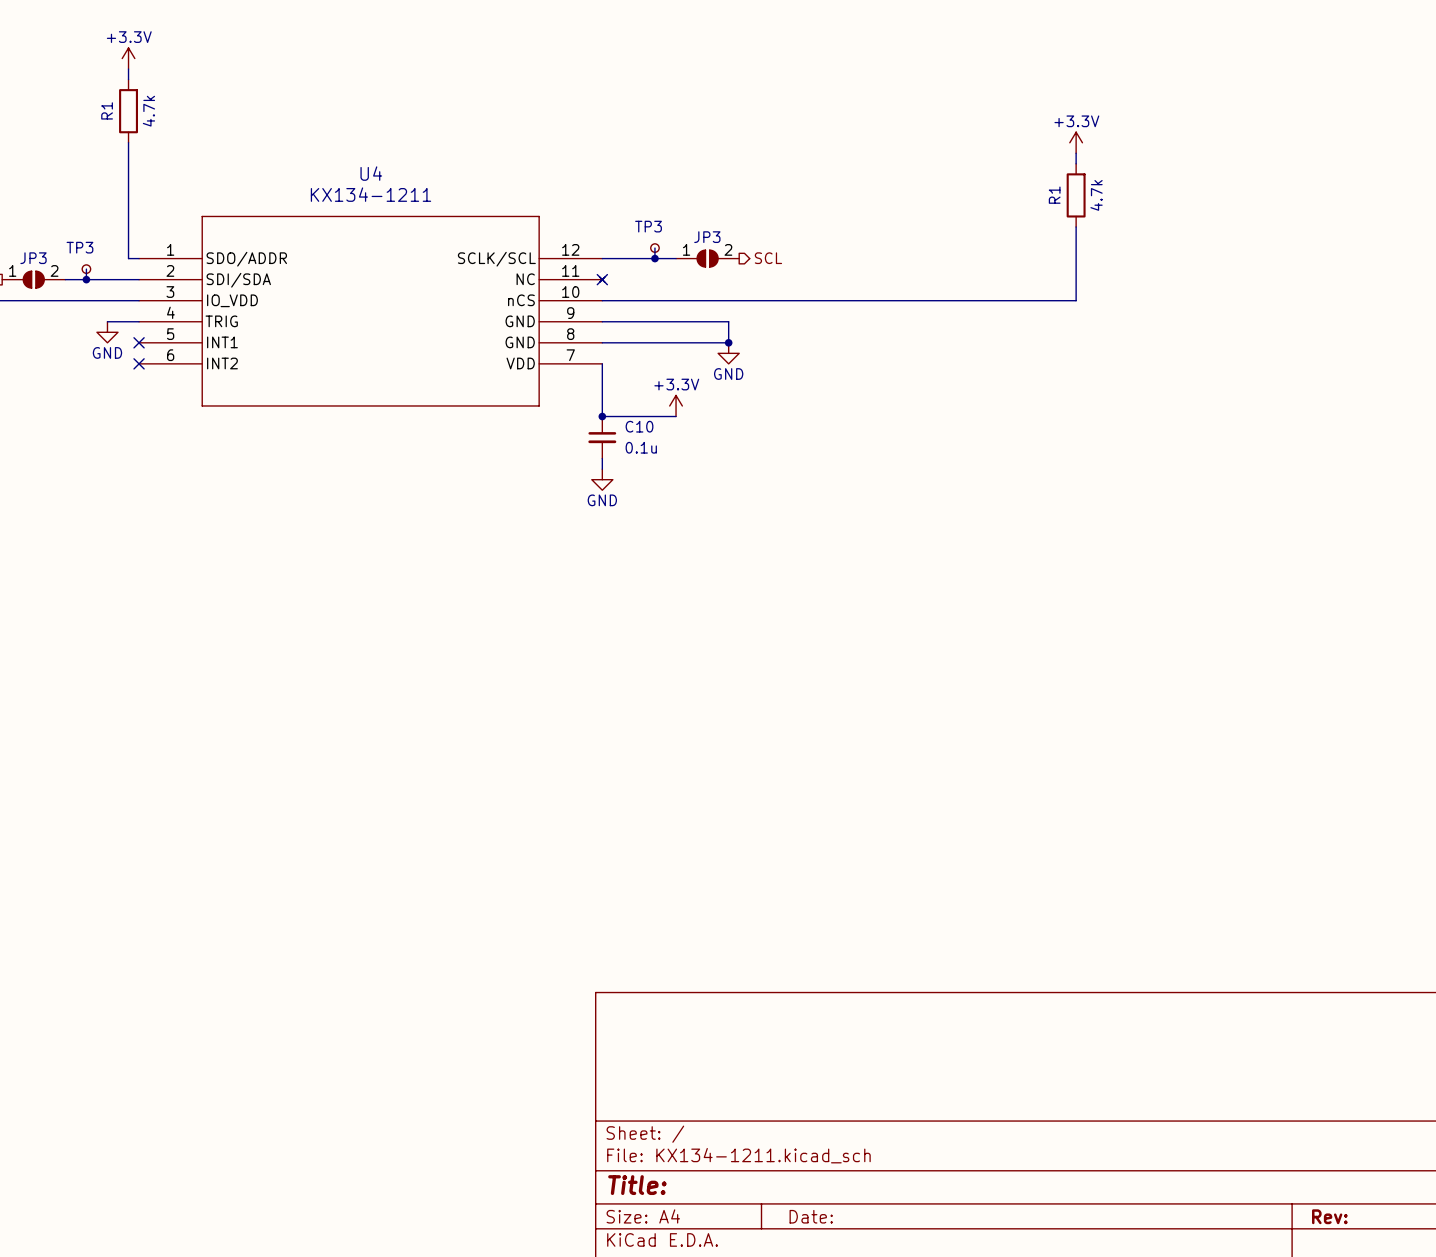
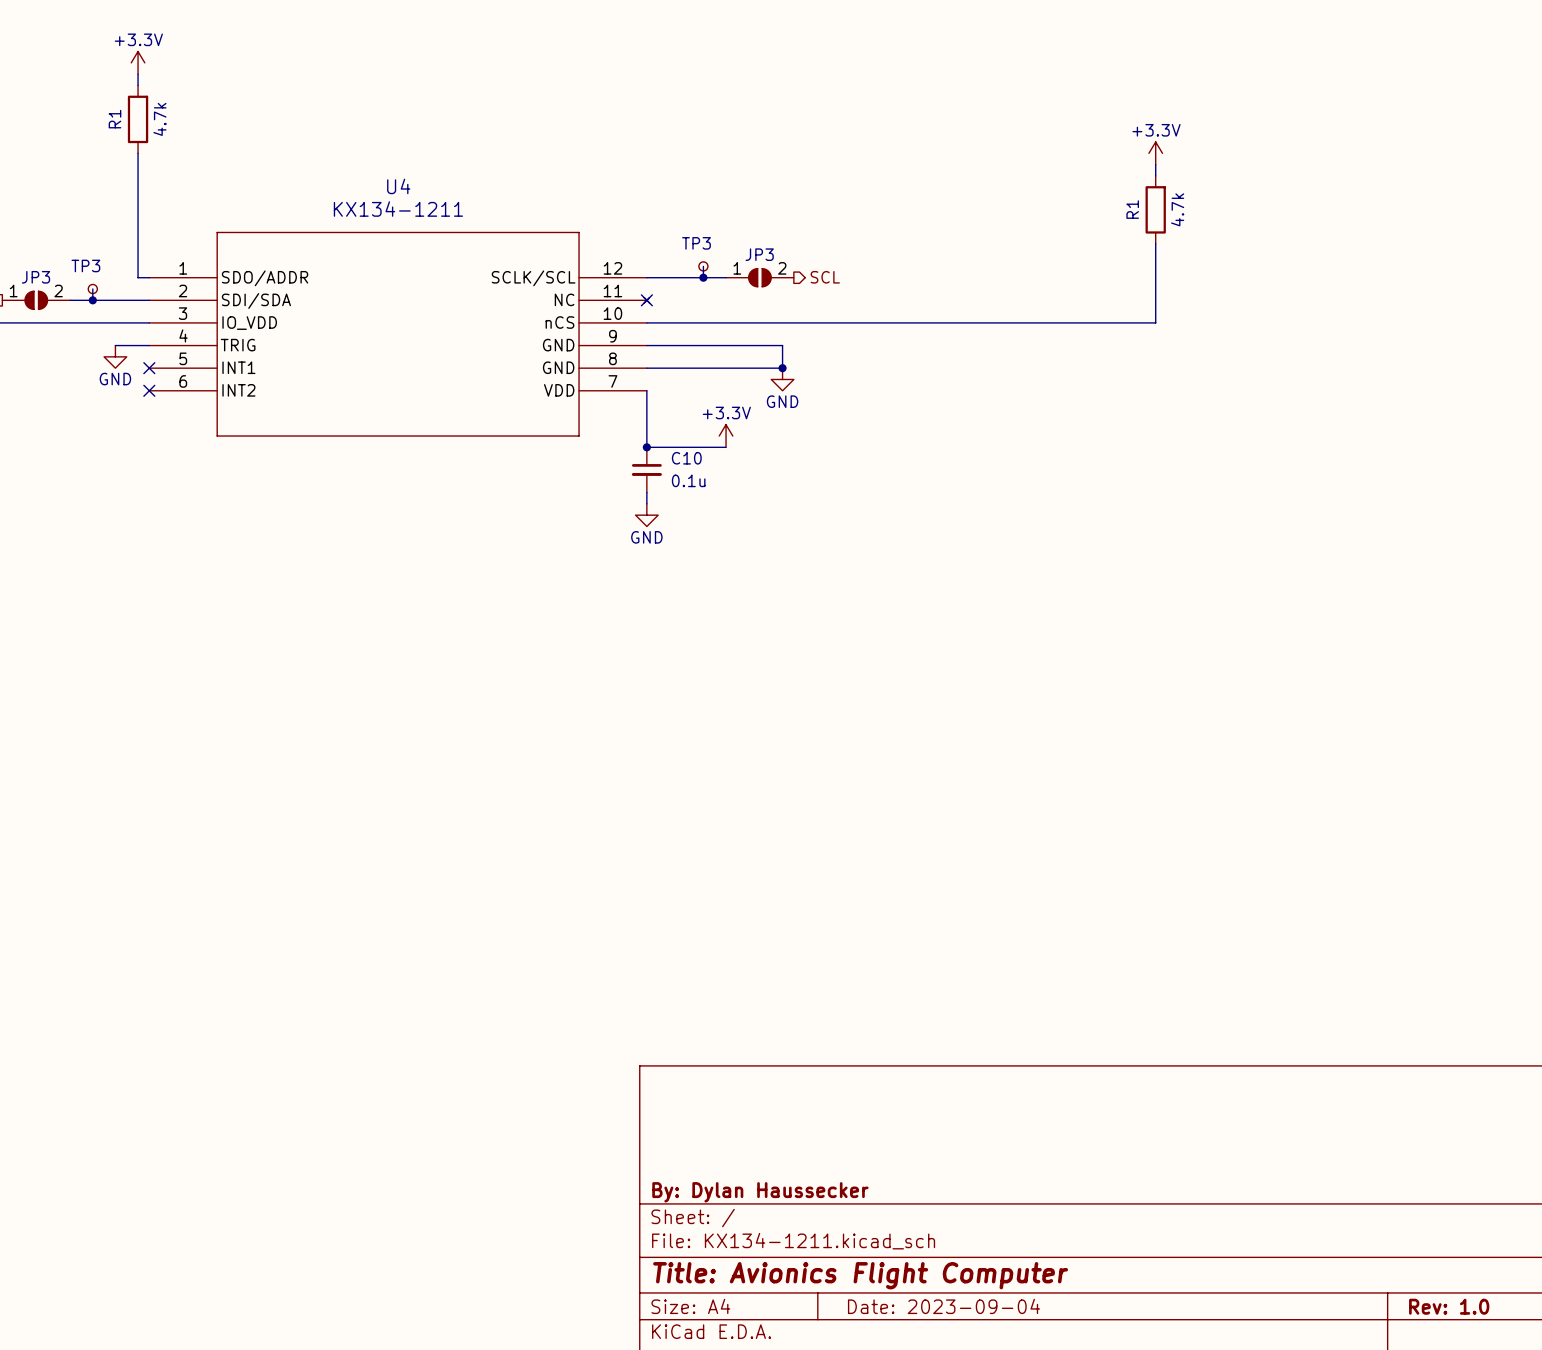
title block: none -> By: Dylan Haussecker (760, 1192)
title block: Title: (637, 1185) -> Title: Avionics Flight Computer (860, 1275)
title block: Date: (811, 1216) -> Date: 2023-09-04 (943, 1306)
title block: Rev: (1329, 1216) -> Rev: 1.0 (1449, 1306)

